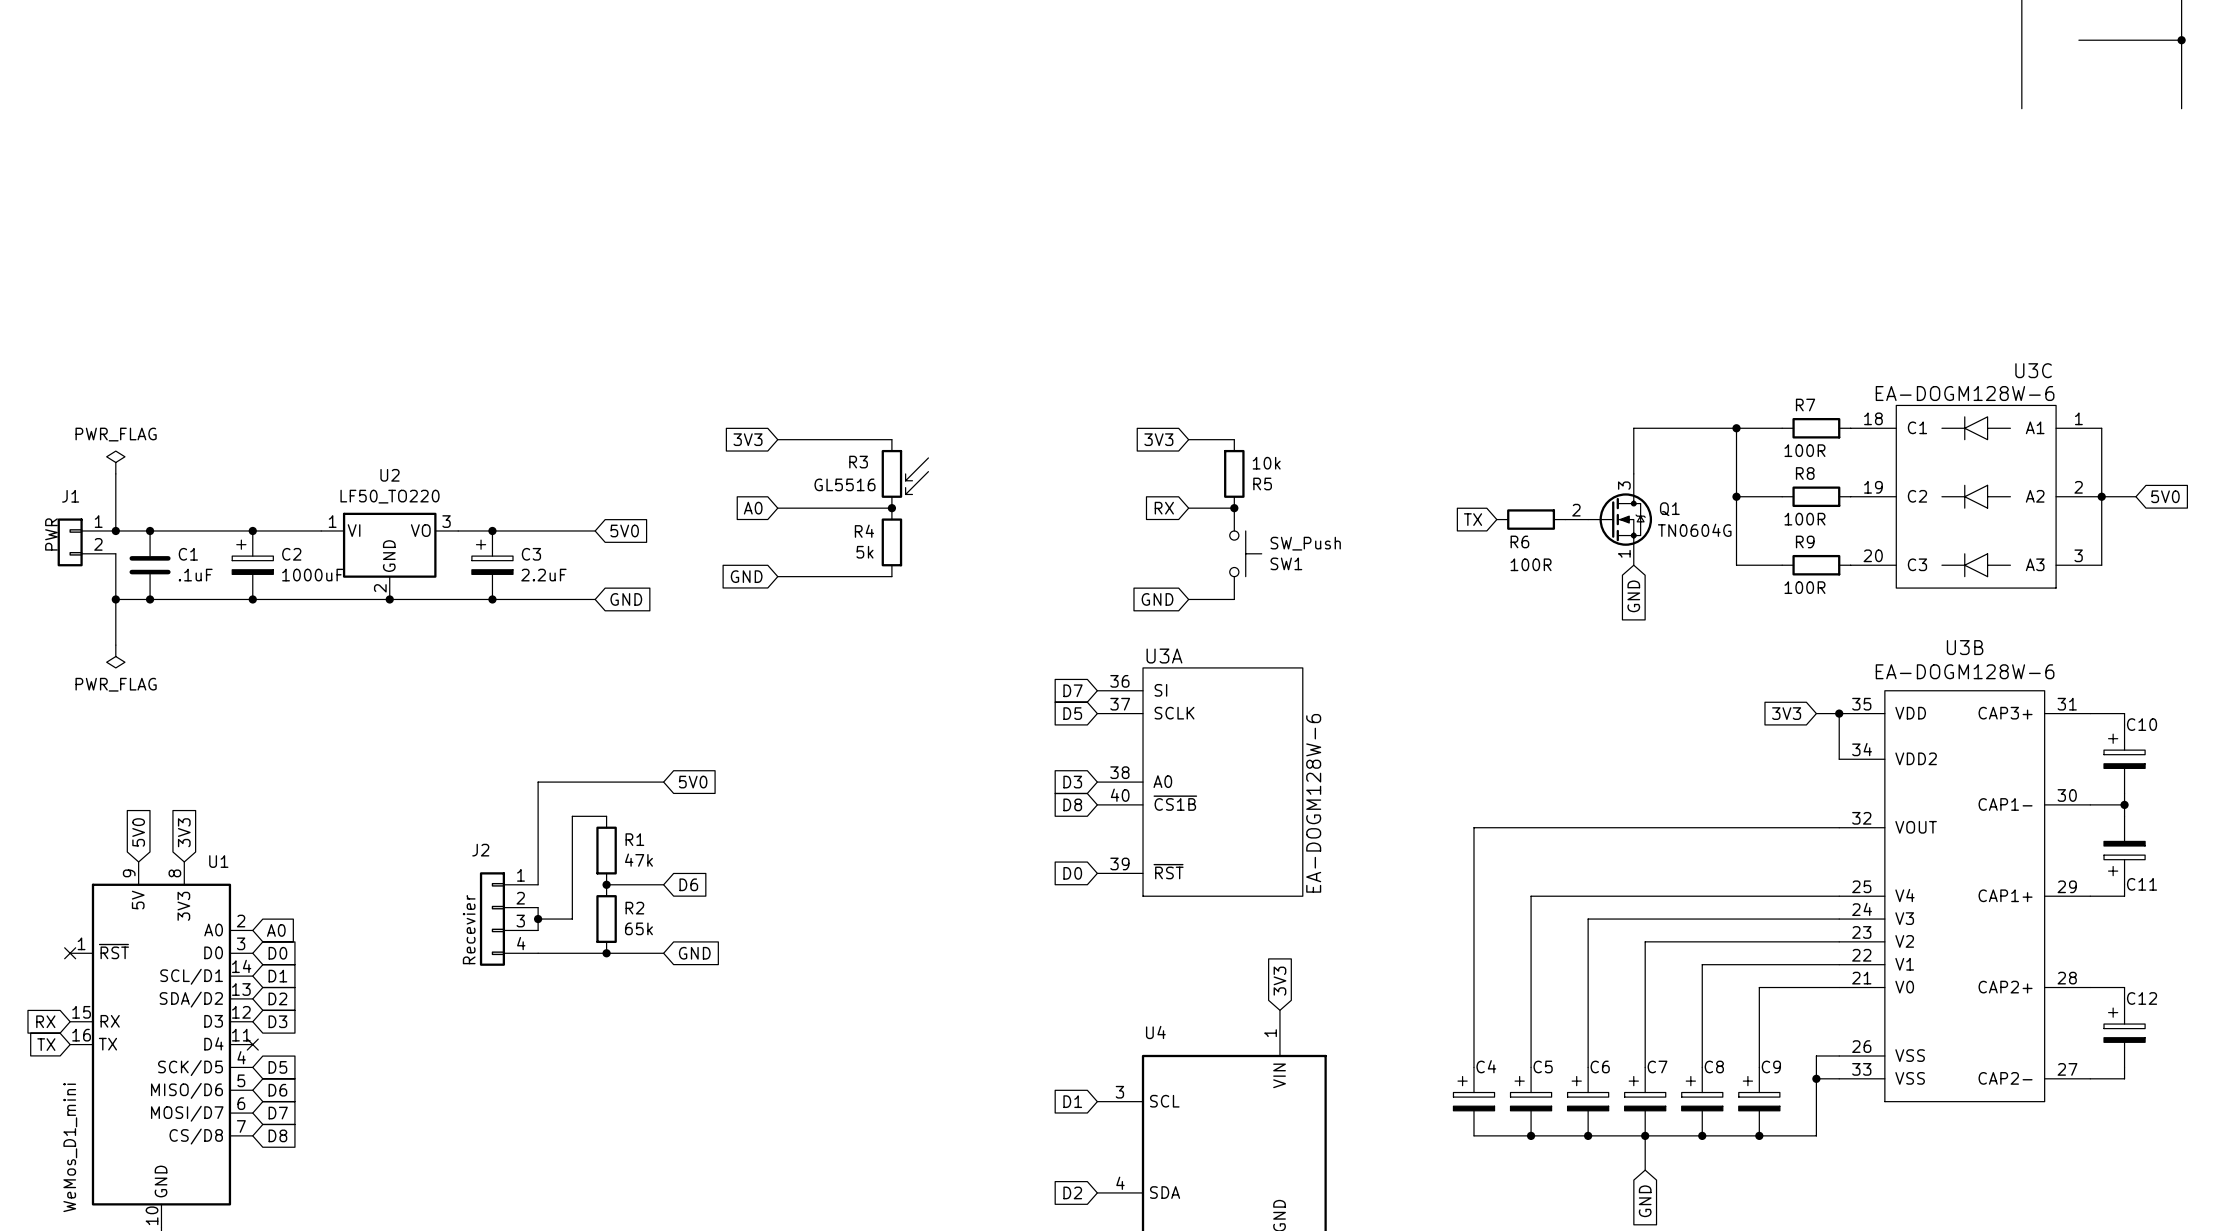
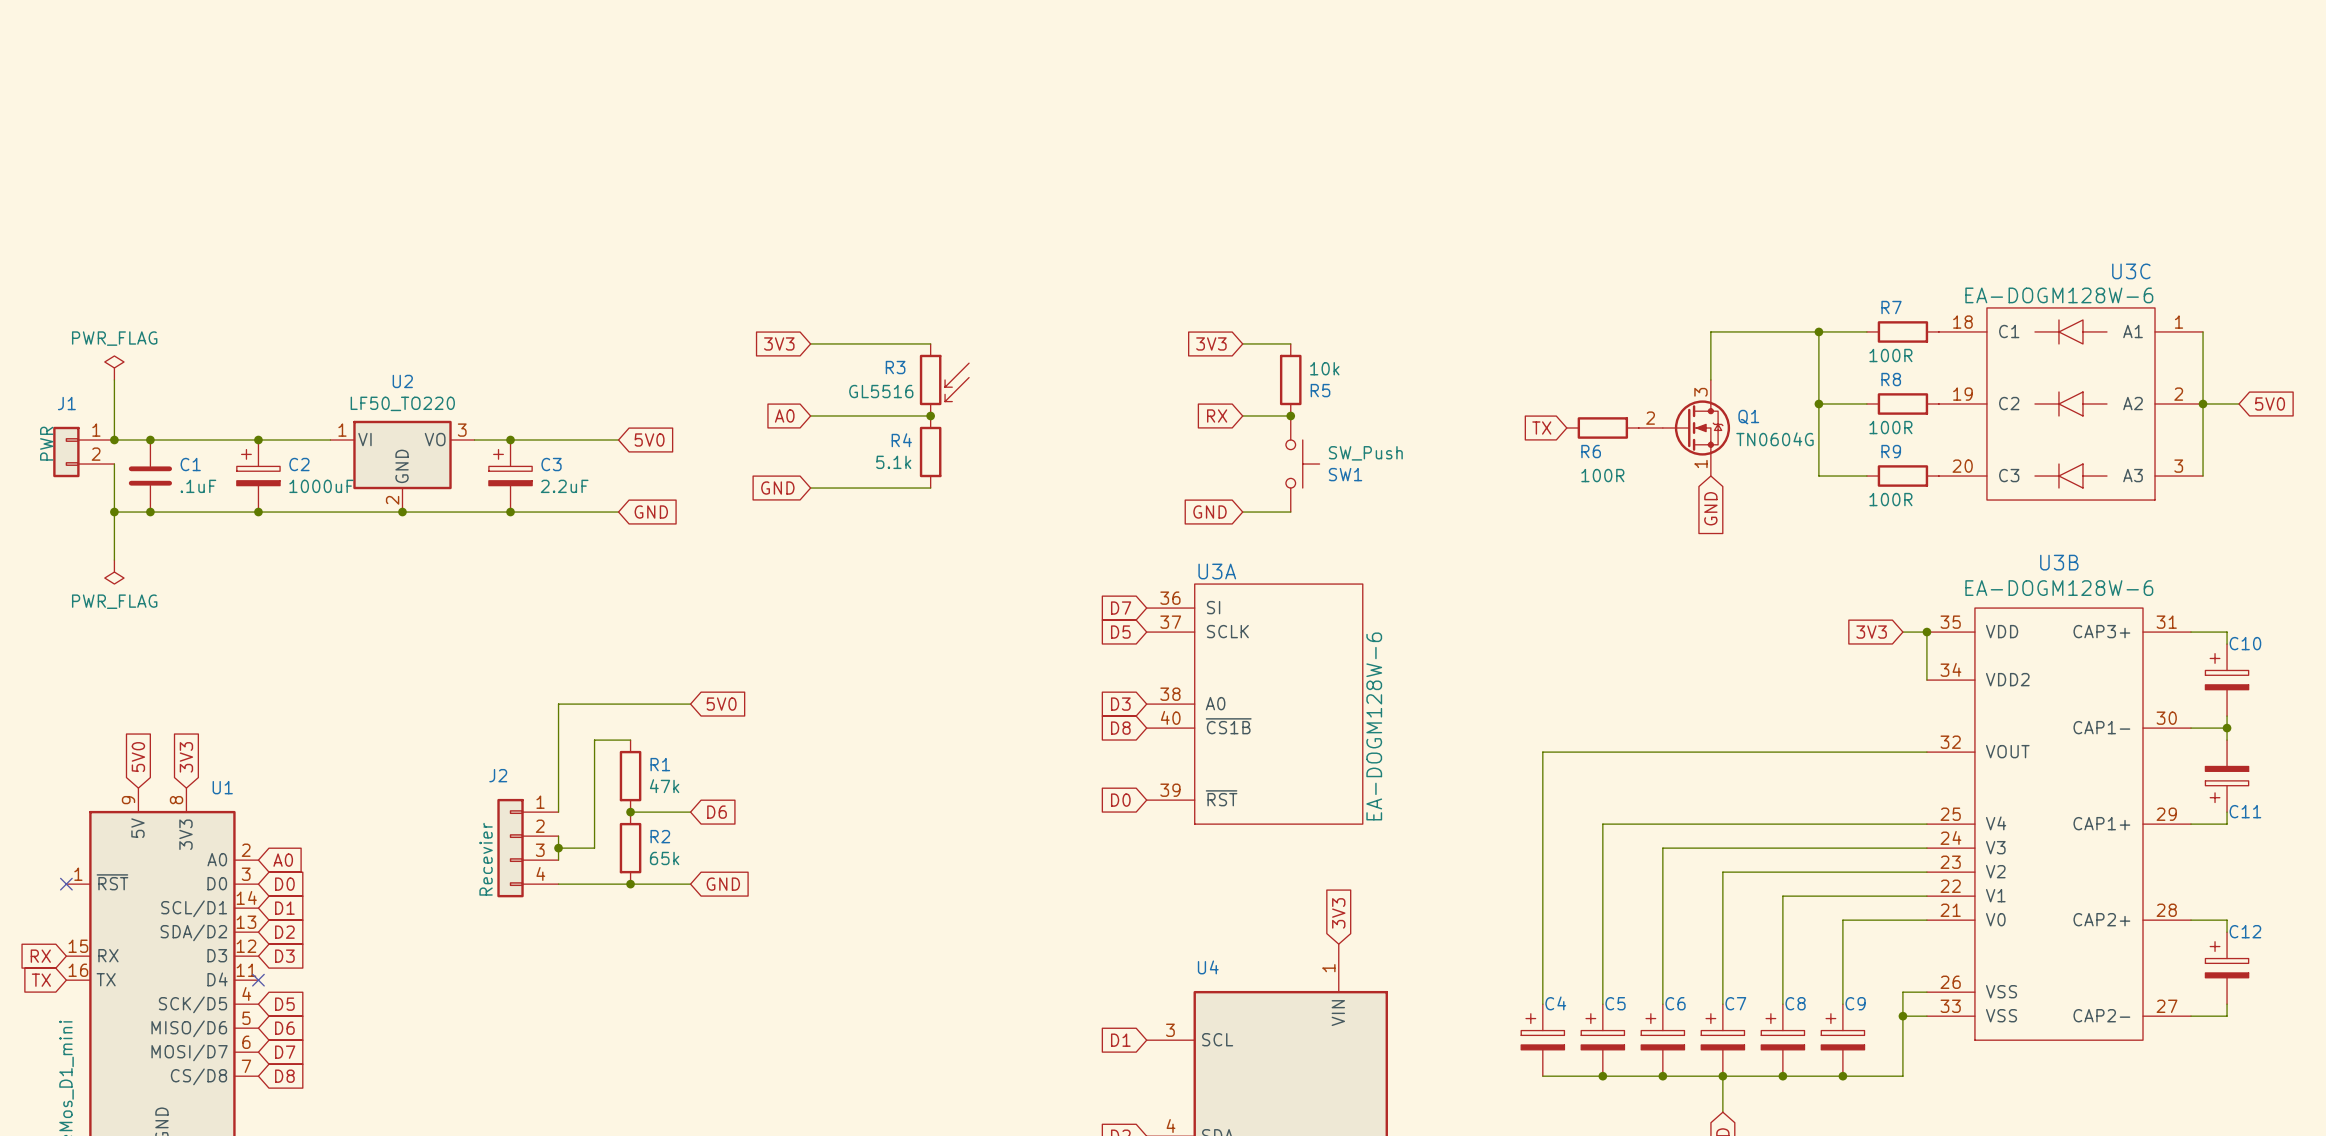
R4 value: 5k (864, 552) -> 5.1k (893, 462)

